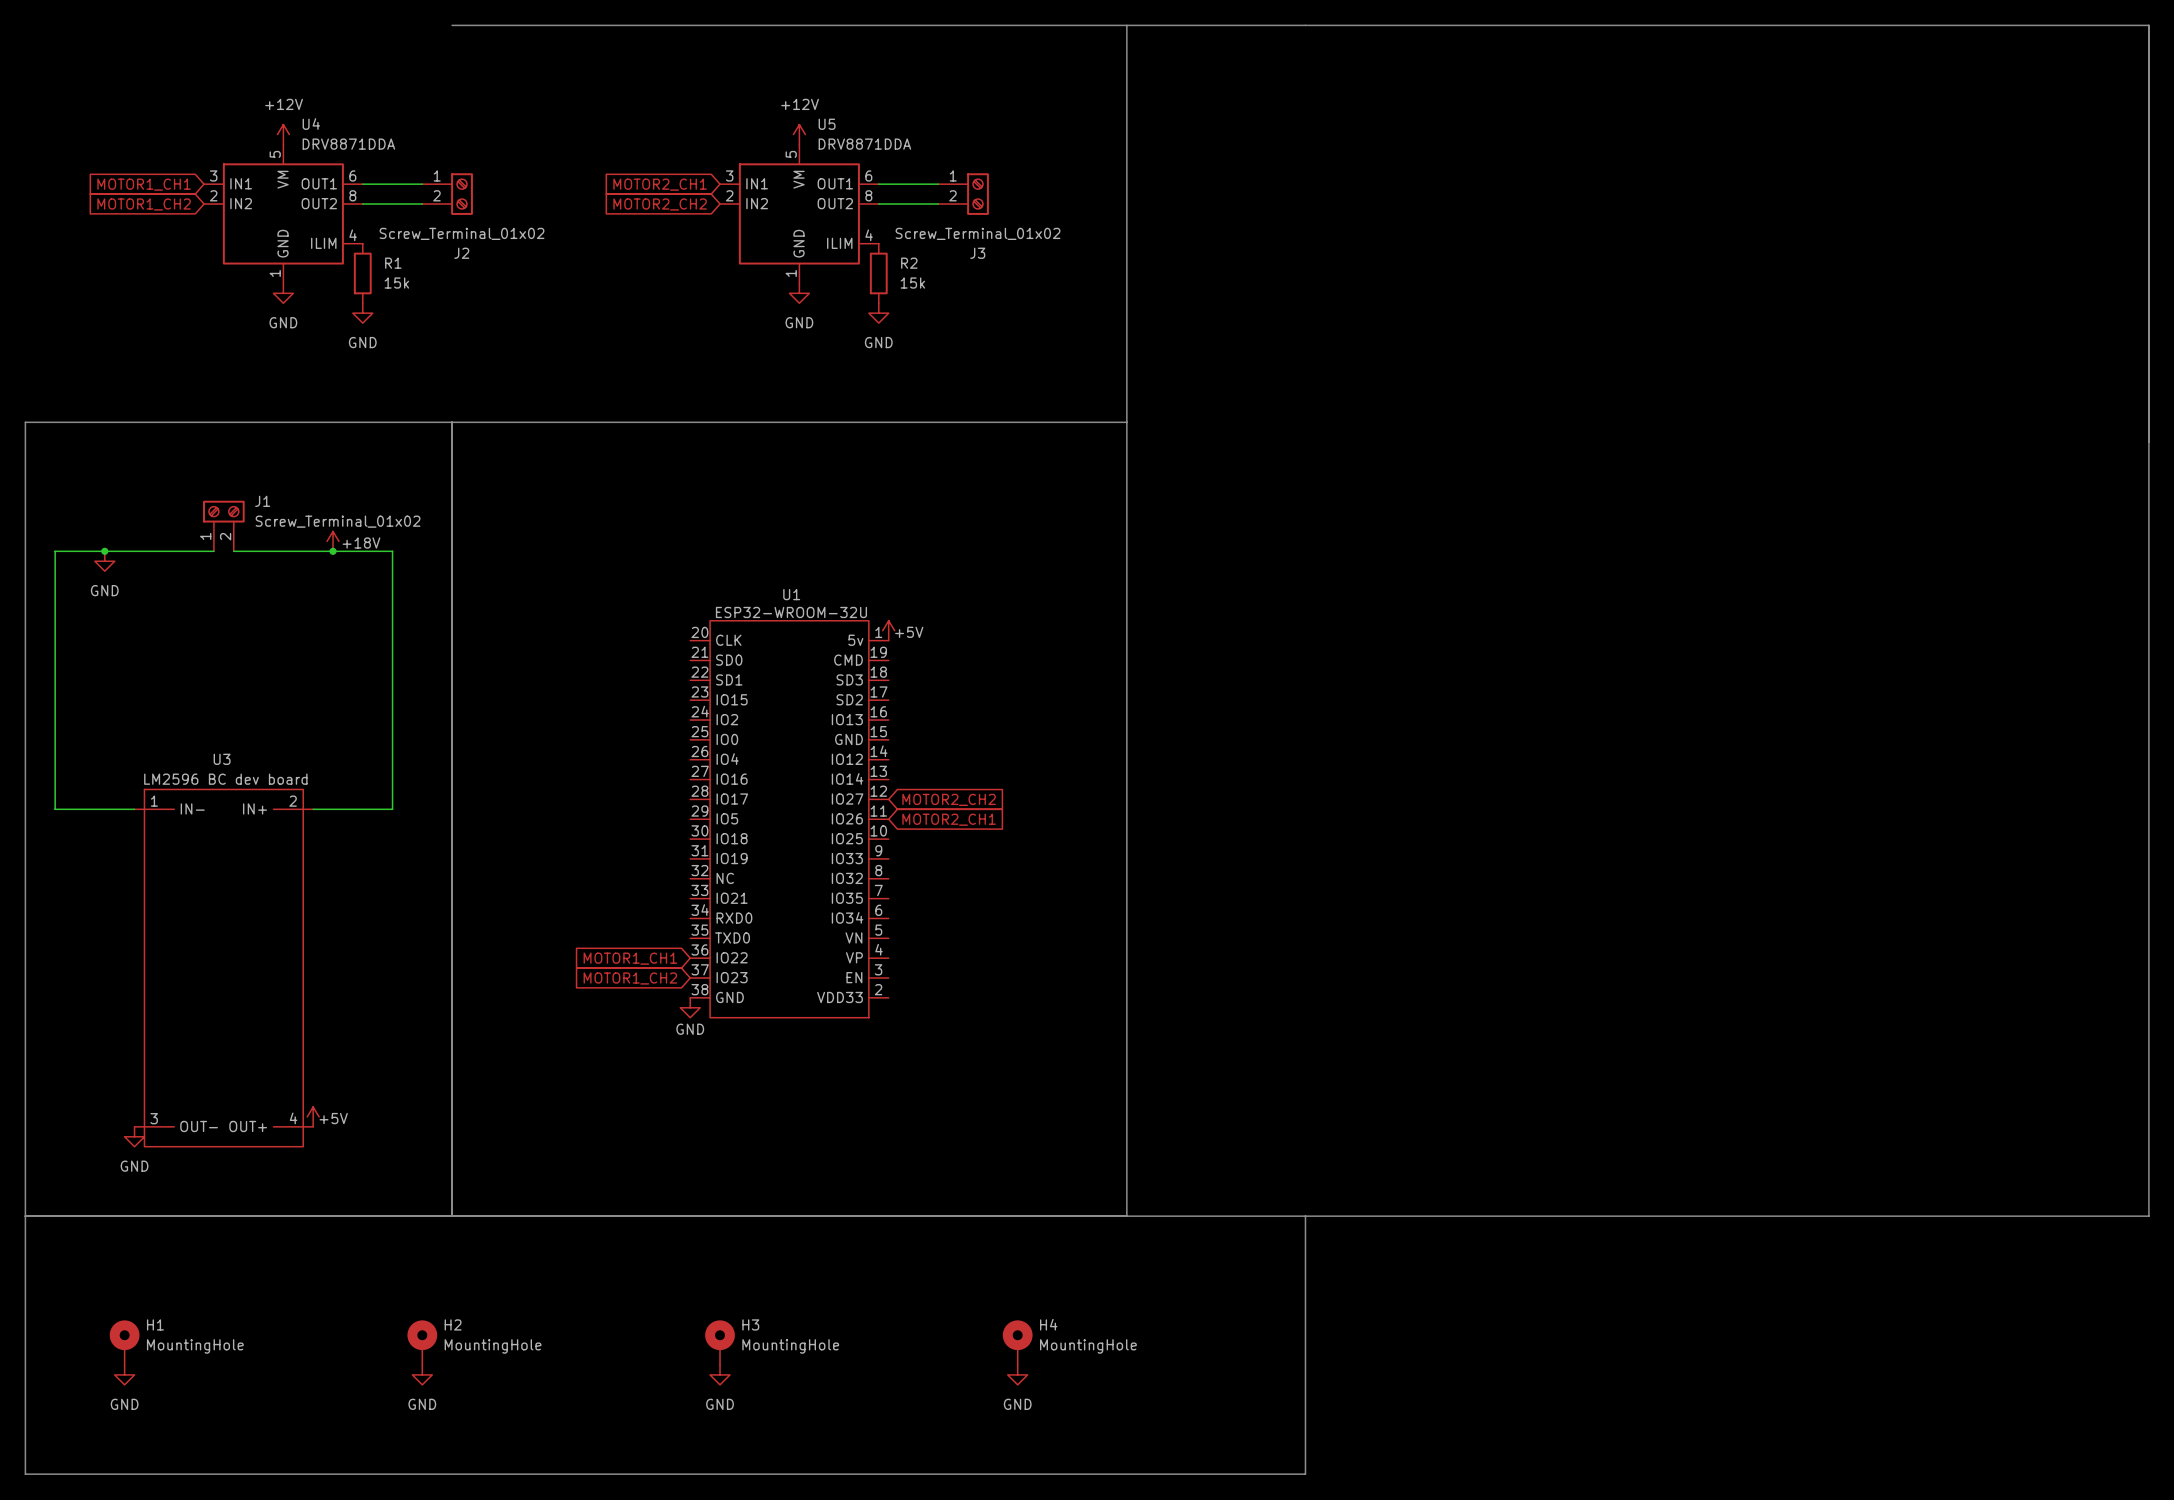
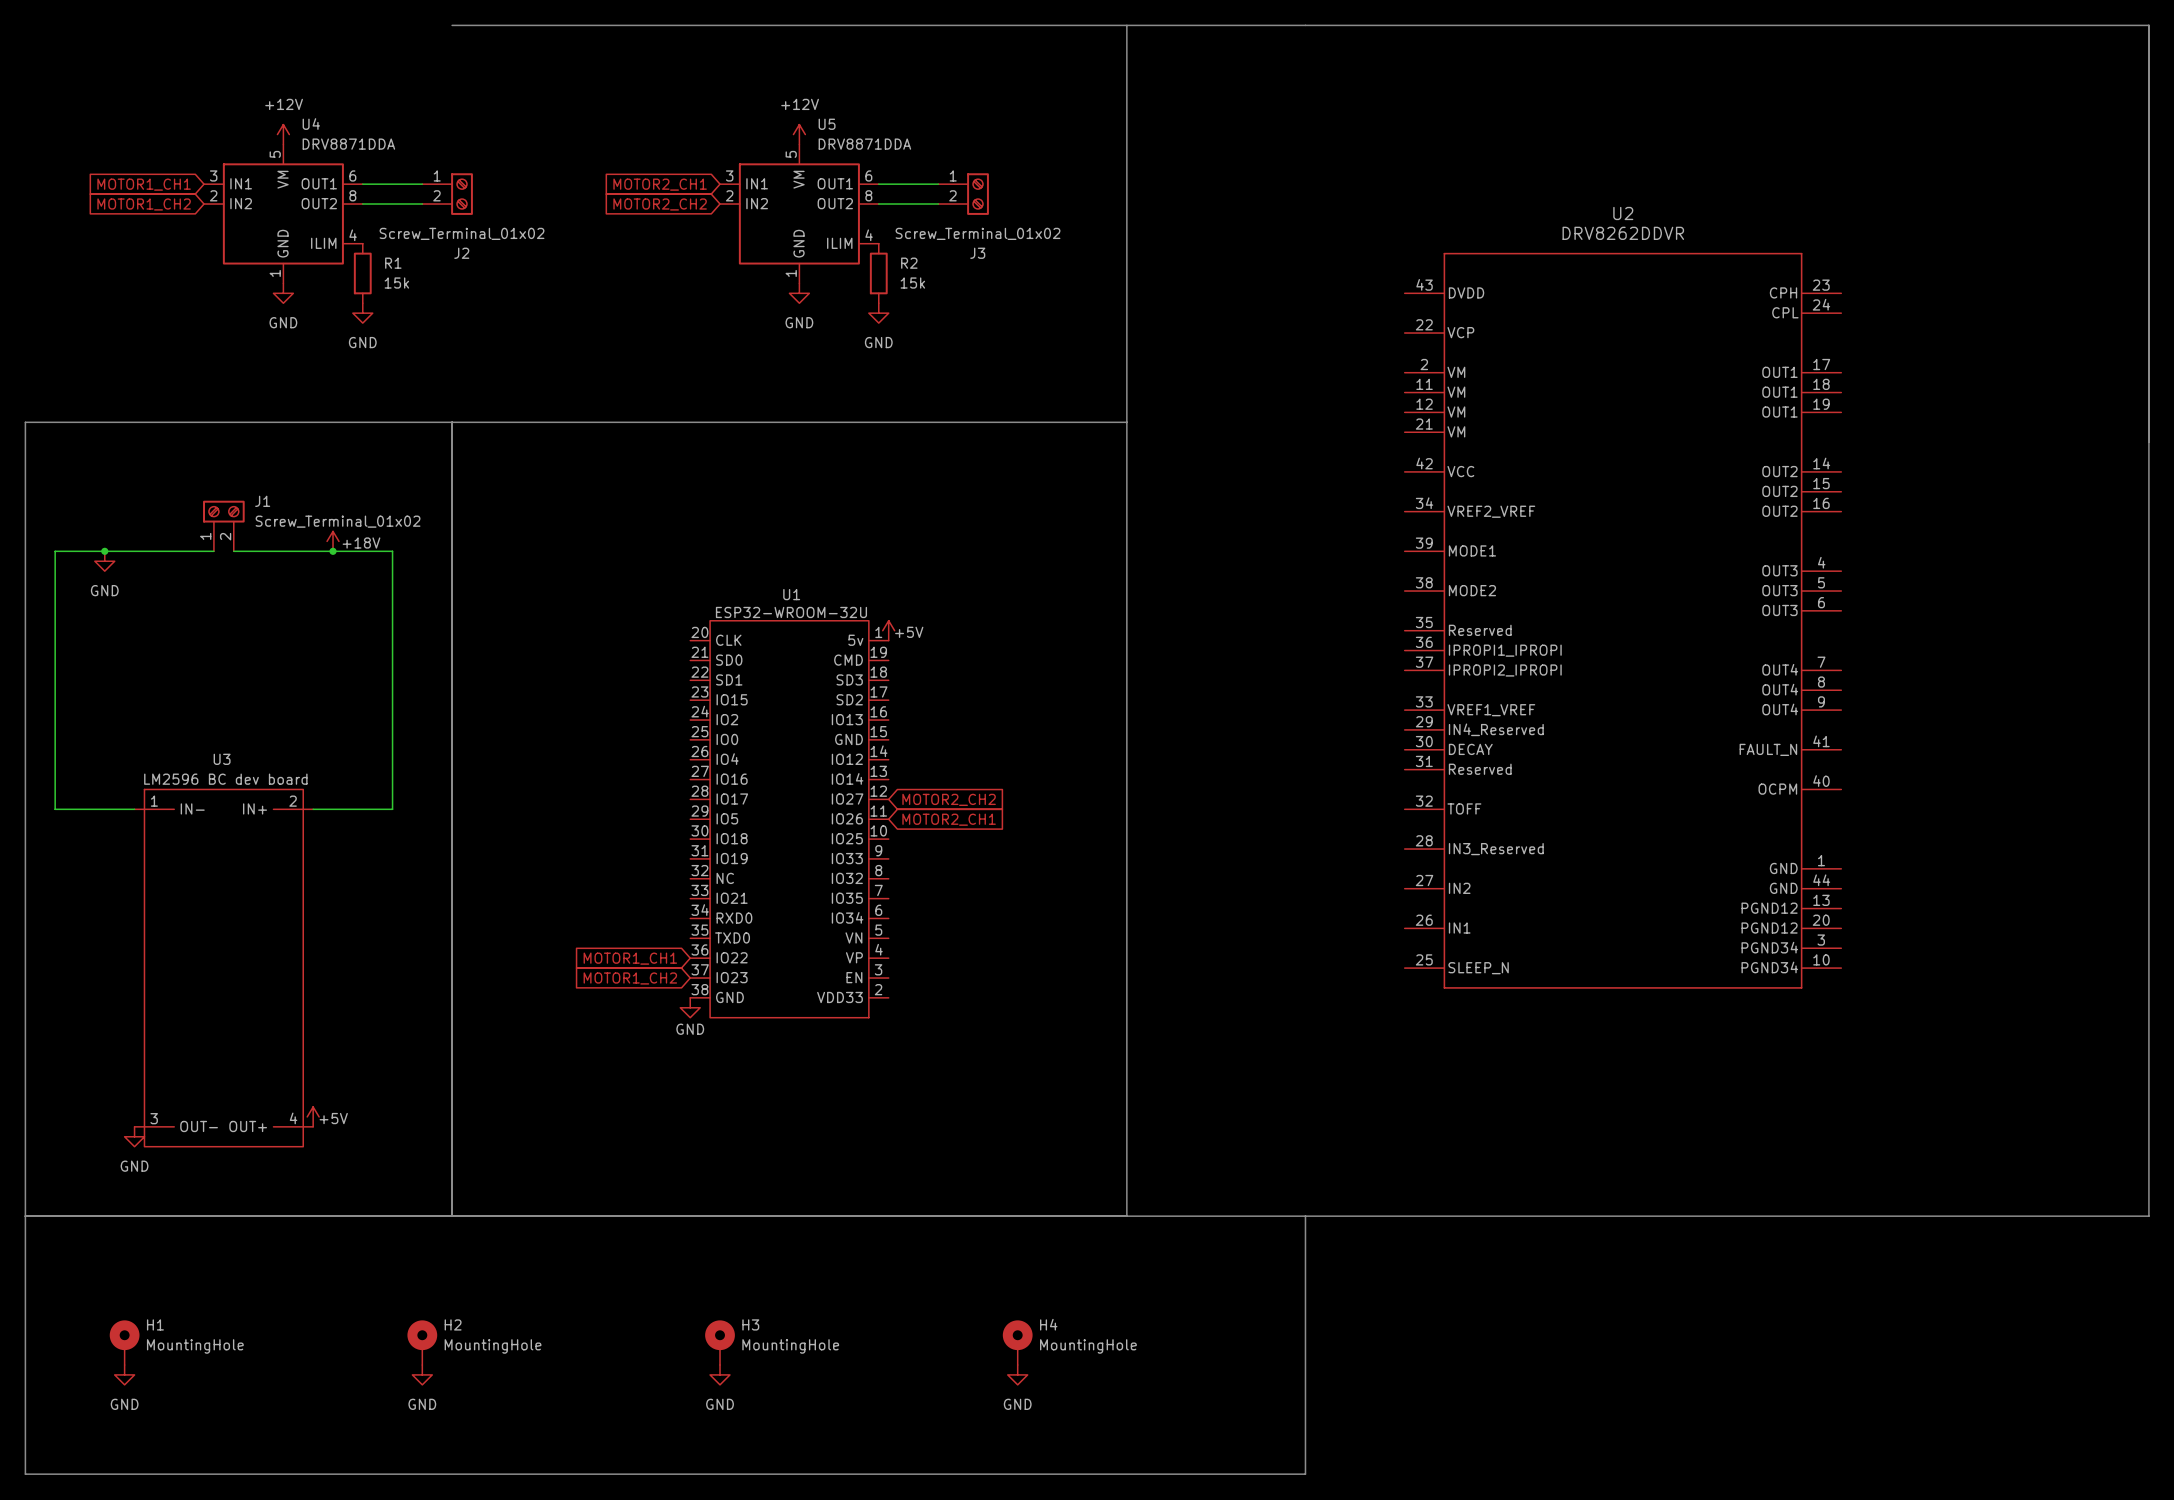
U2: none -> DRV8262DDVR (1623, 620)

